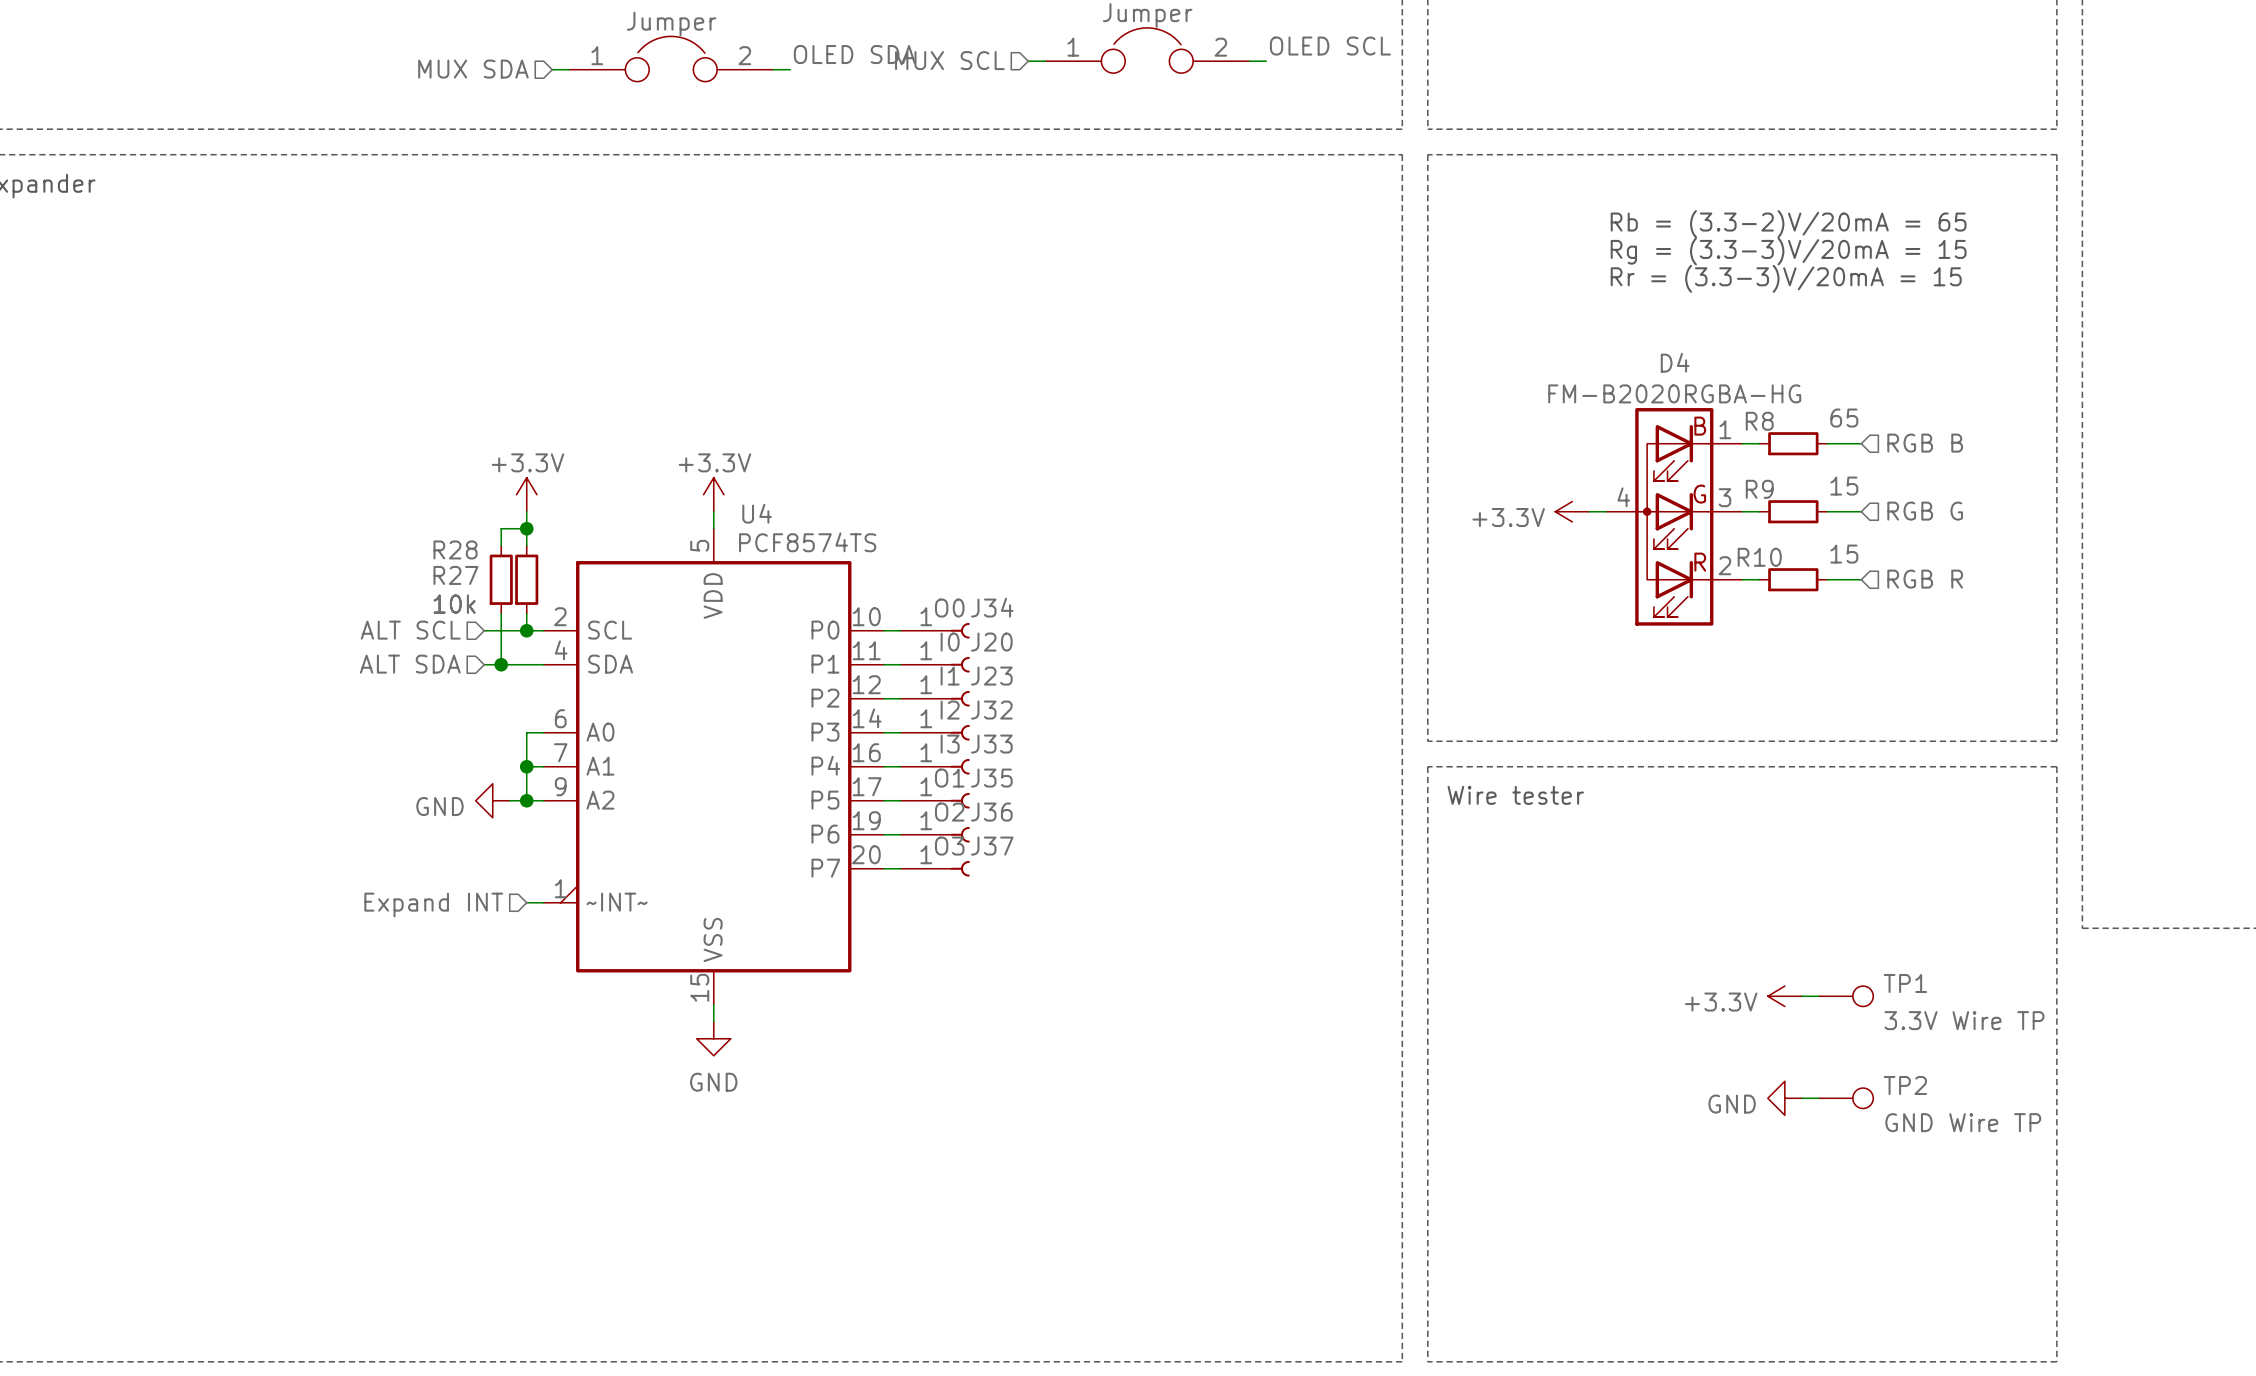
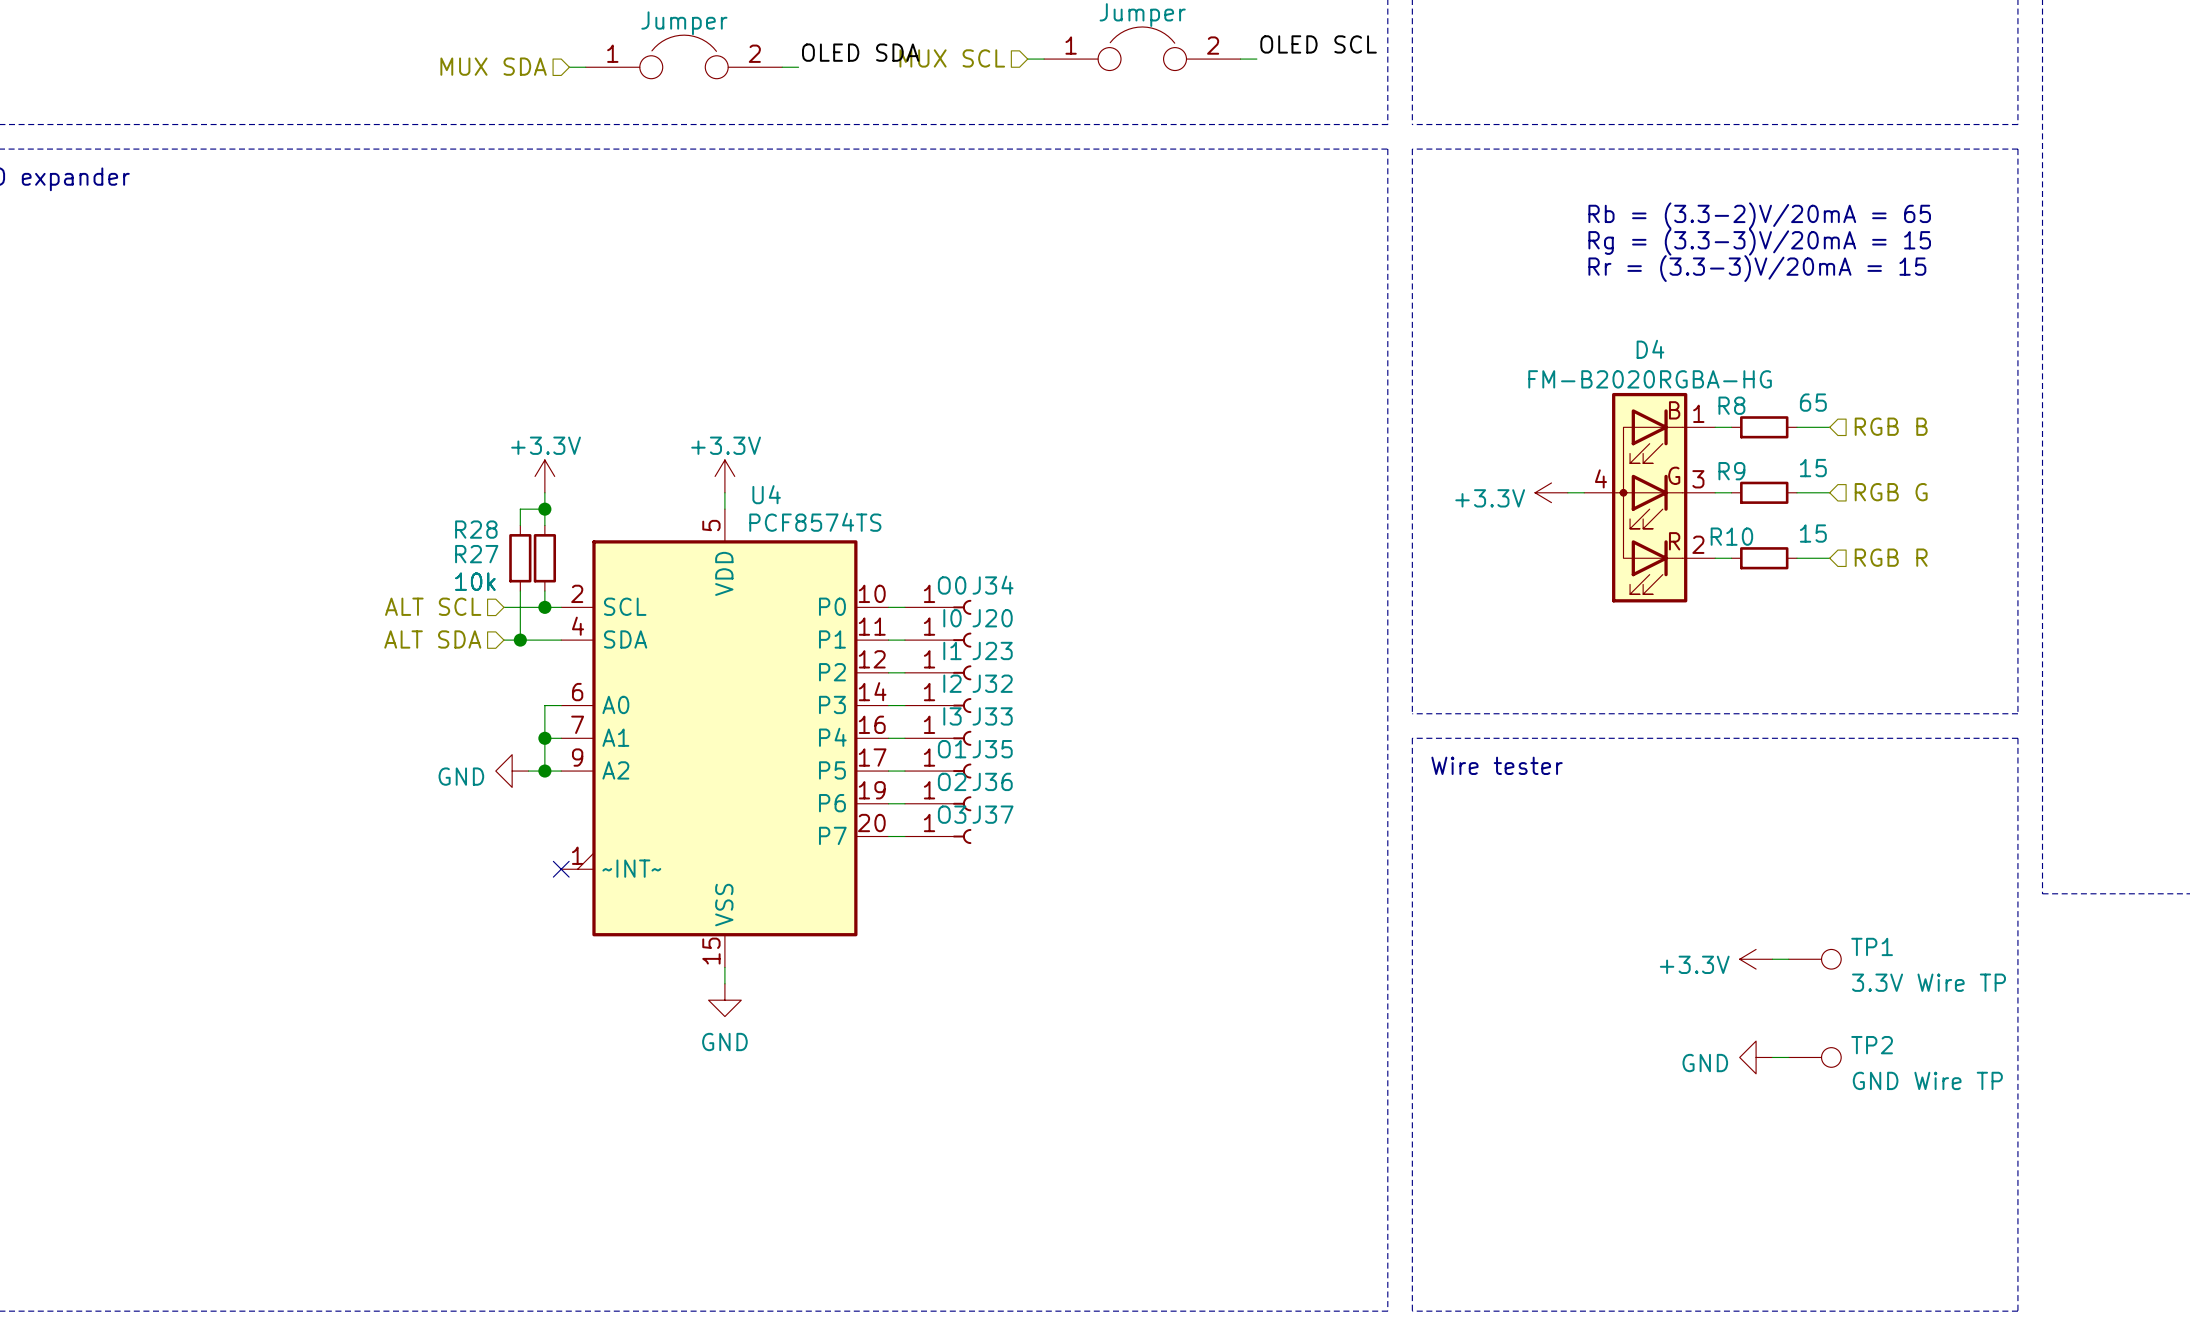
wire: (526, 902) (543, 902) -> none
no-connect mark: none -> (561, 869)
hierarchical label: Expand INT (433, 904) -> none

